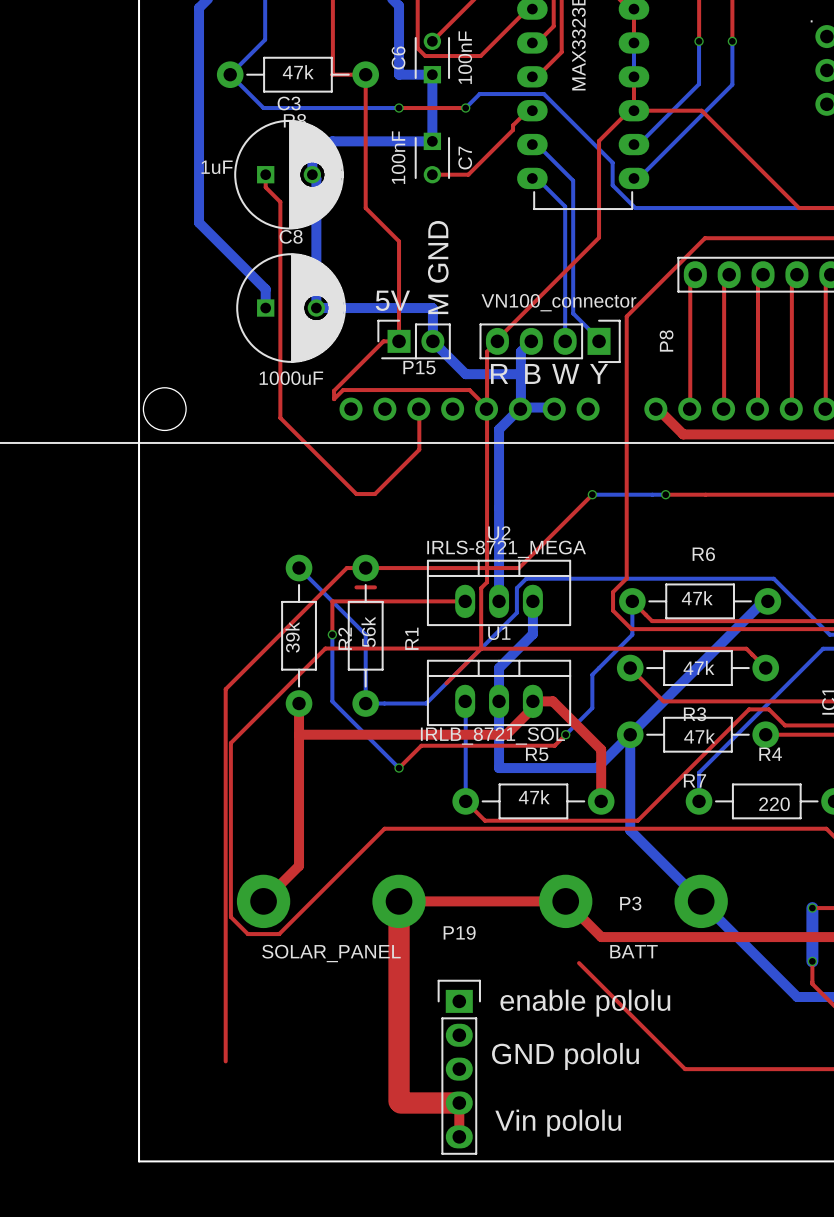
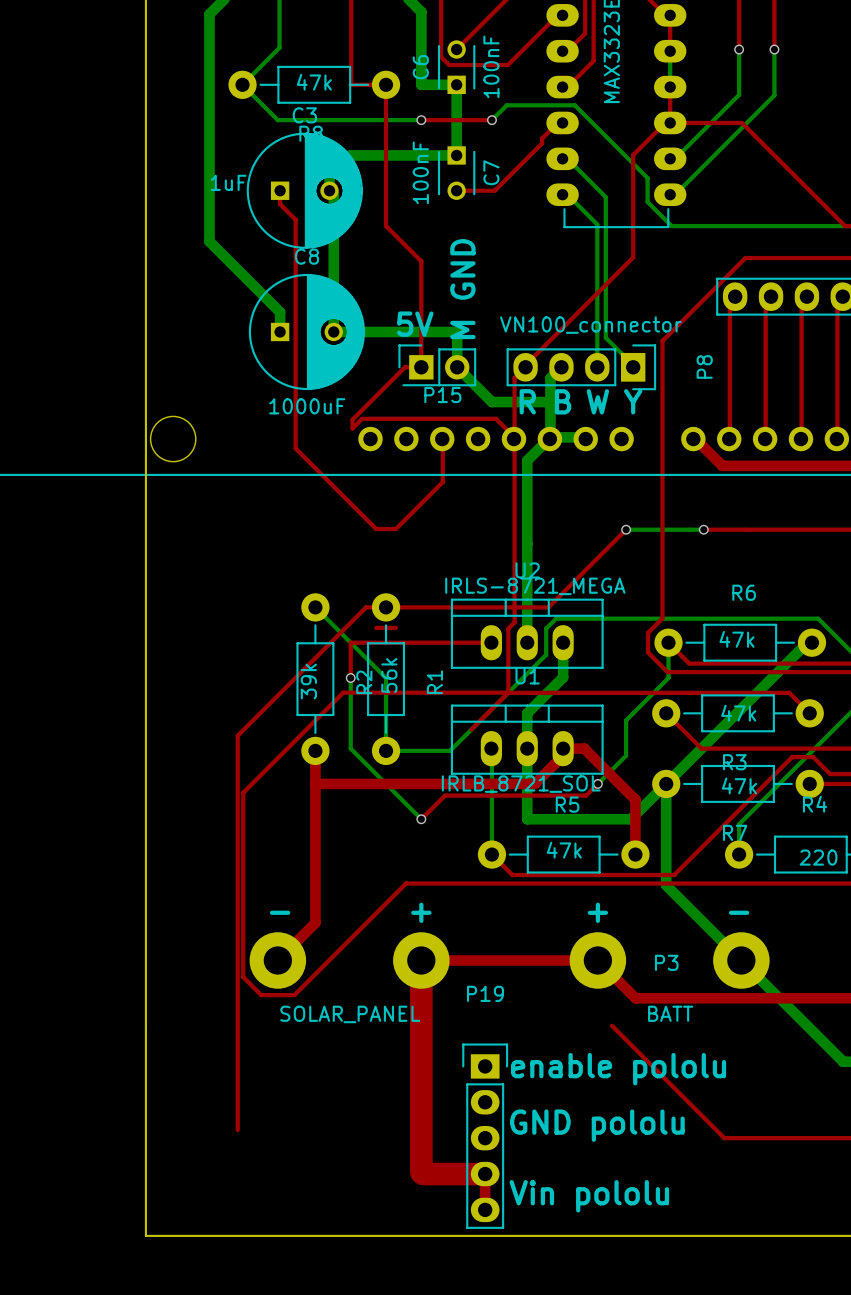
text: none -> + (421, 912)
text: none -> + (597, 912)
text: none -> - (280, 912)
text: none -> - (739, 912)

